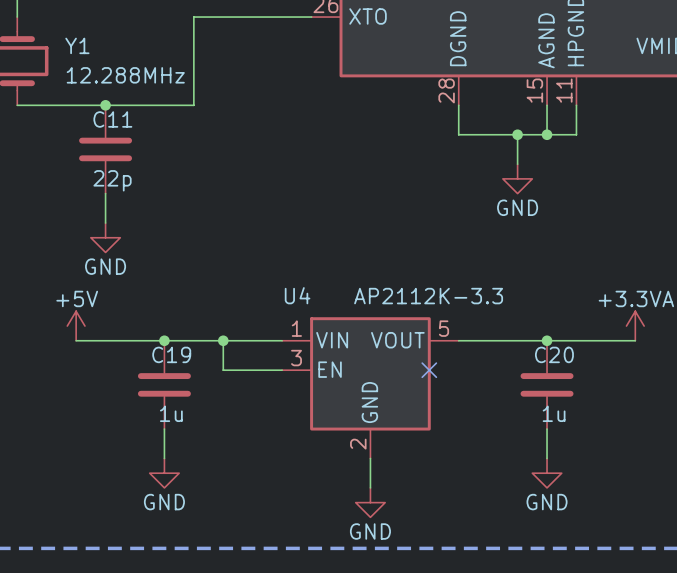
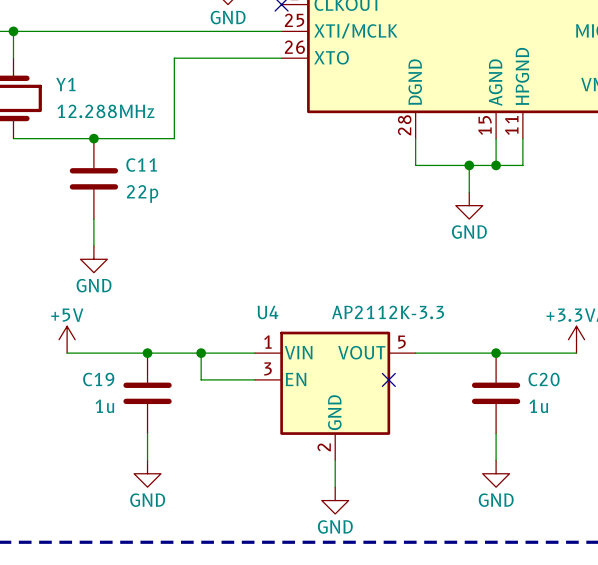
C11 name position: C11 (112, 119) -> C11 (141, 165)
C11 value position: 22p (112, 180) -> 22p (142, 193)
C19 name position: C19 (171, 354) -> C19 (98, 379)
C20 name position: C20 (554, 354) -> C20 (544, 379)
C19 value position: 1u (171, 413) -> 1u (104, 406)
C20 value position: 1u (554, 413) -> 1u (538, 406)

